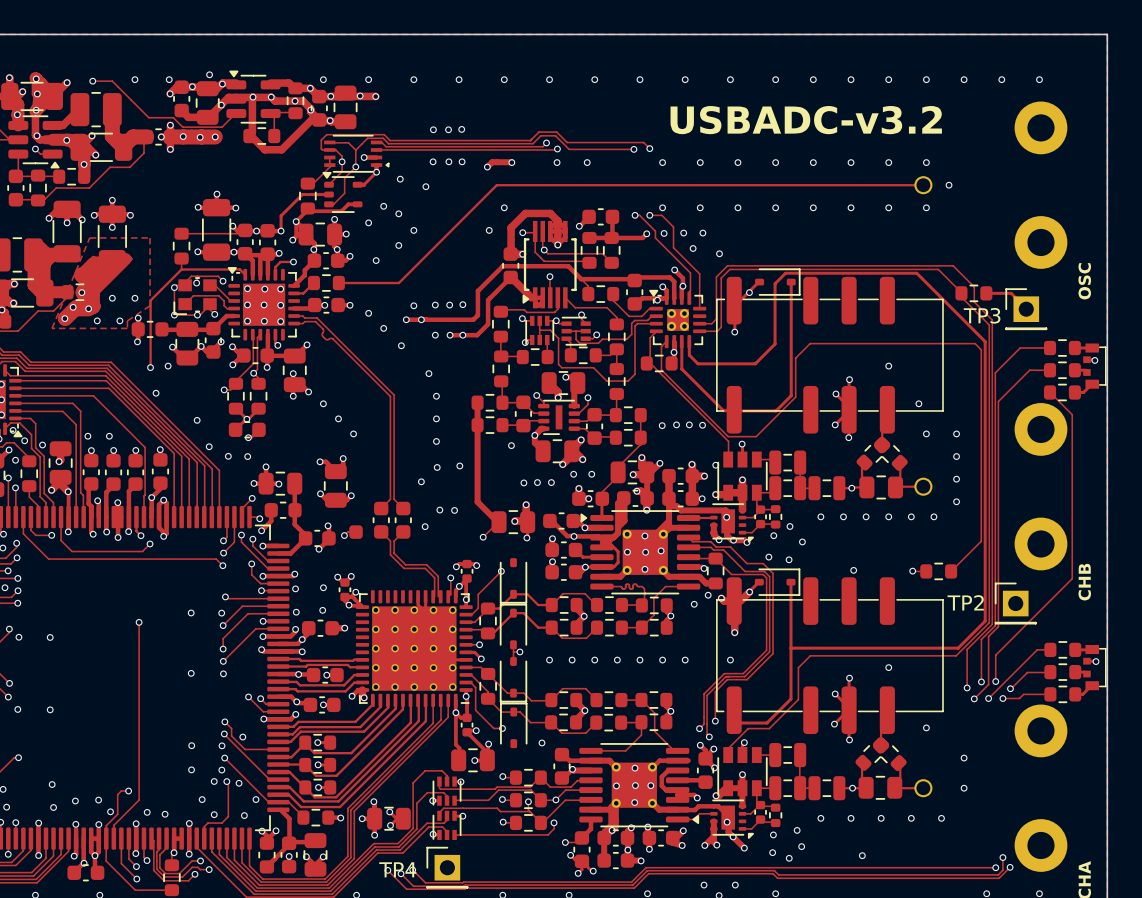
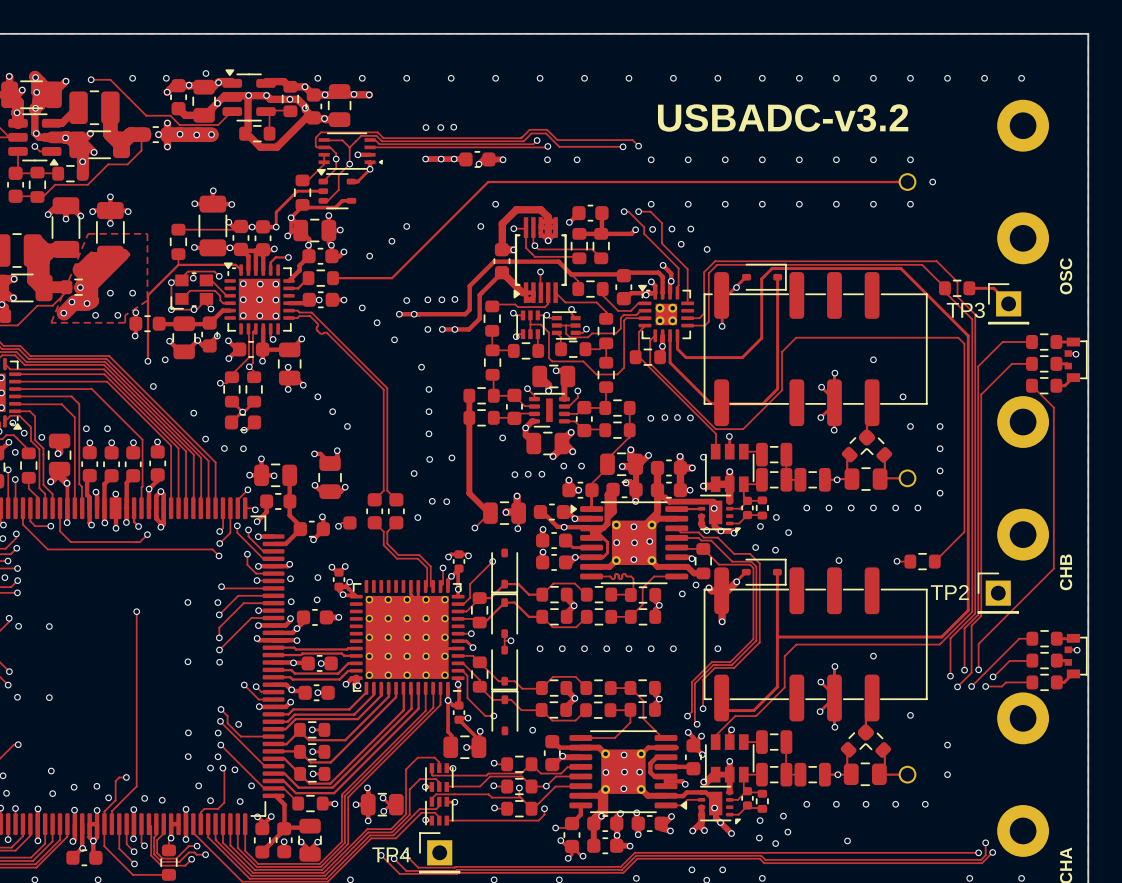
track: none -> (425, 159) (465, 159)
part: none -> (477, 159)
via: (400, 179) -> none
via: (425, 186) -> none
via: (383, 206) -> none
via: (398, 213) -> none
via: (368, 222) -> none

